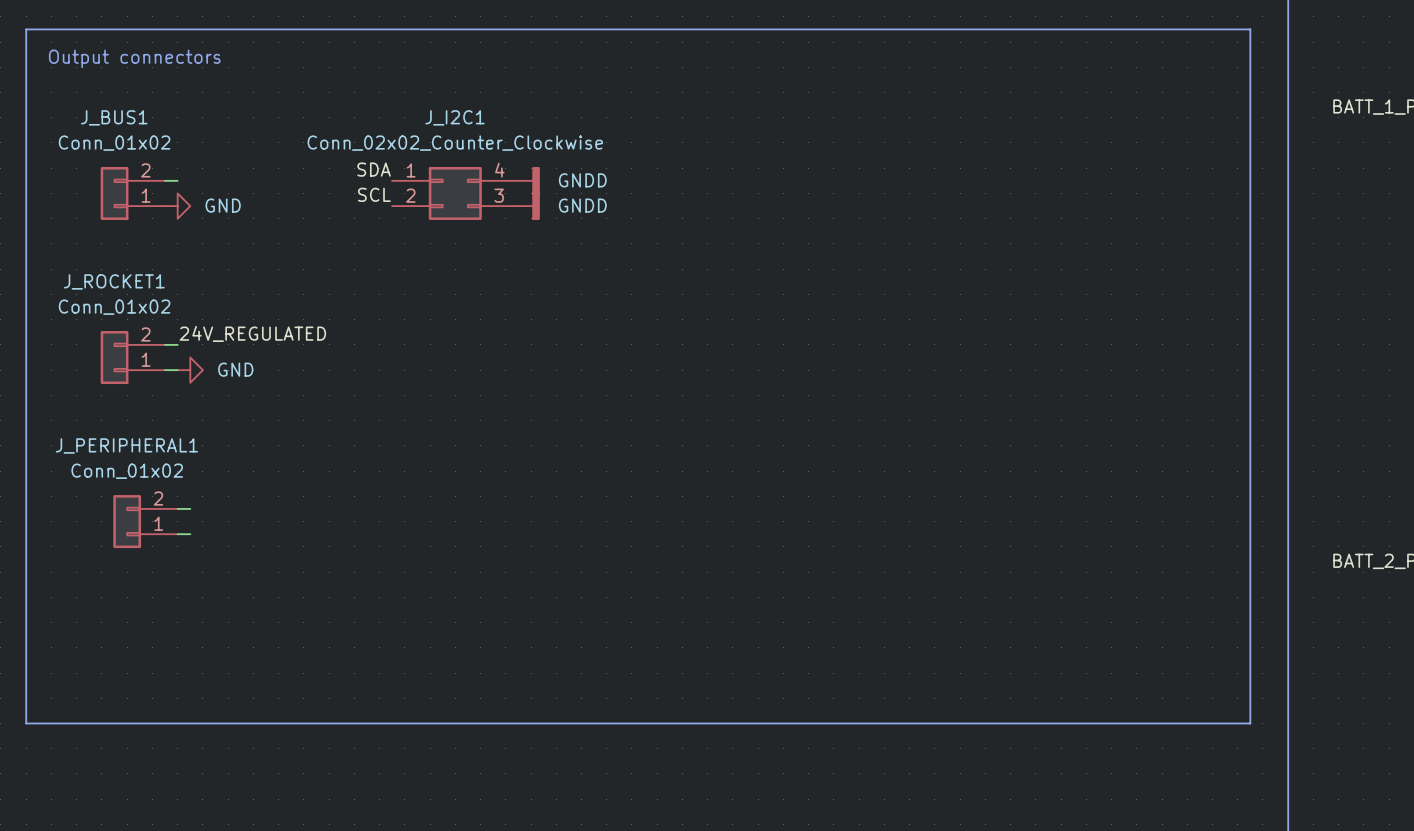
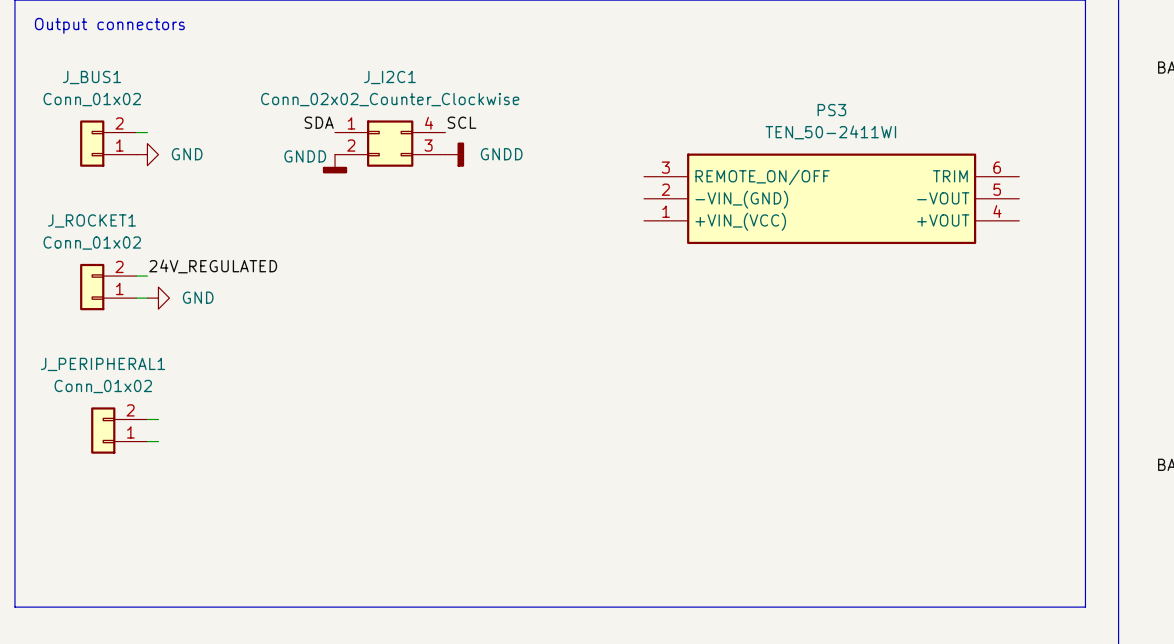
power symbol rotation: 0° (529, 180) -> 90° clockwise (335, 164)
power symbol position: GNDD (529, 180) -> GNDD (335, 164)
power symbol text position: GNDD (582, 180) -> GNDD (305, 156)
label position: SCL (374, 194) -> SCL (462, 122)
PS3: none -> TEN_50-2411WI (831, 198)

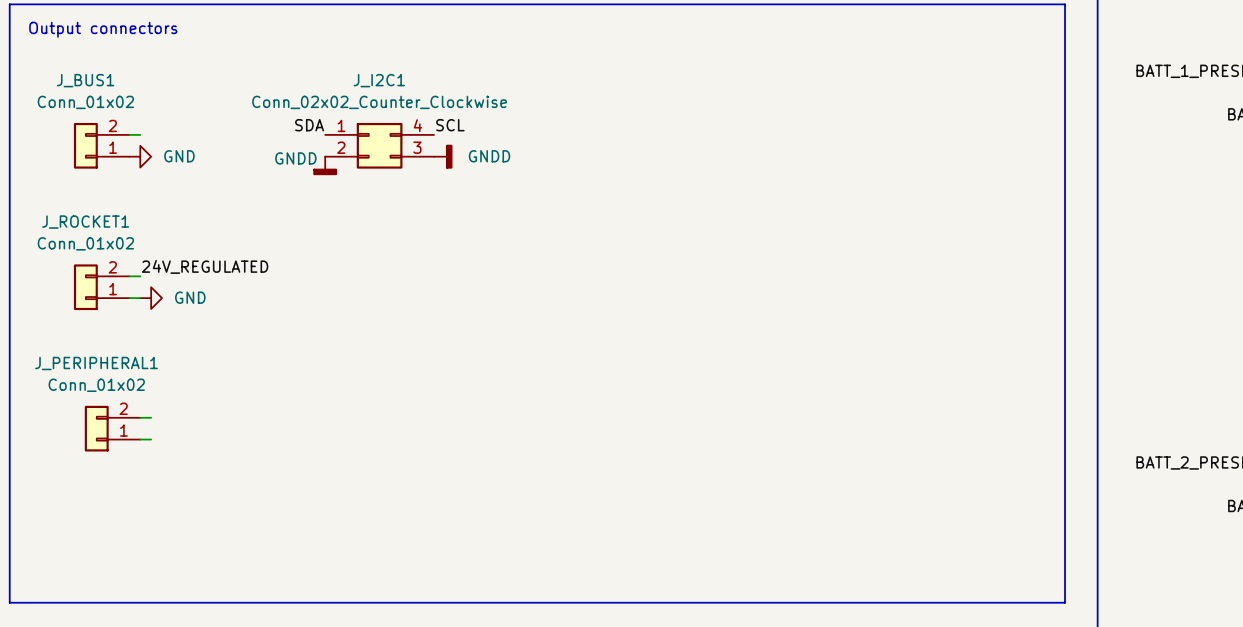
PS3: TEN_50-2411WI (831, 198) -> none

